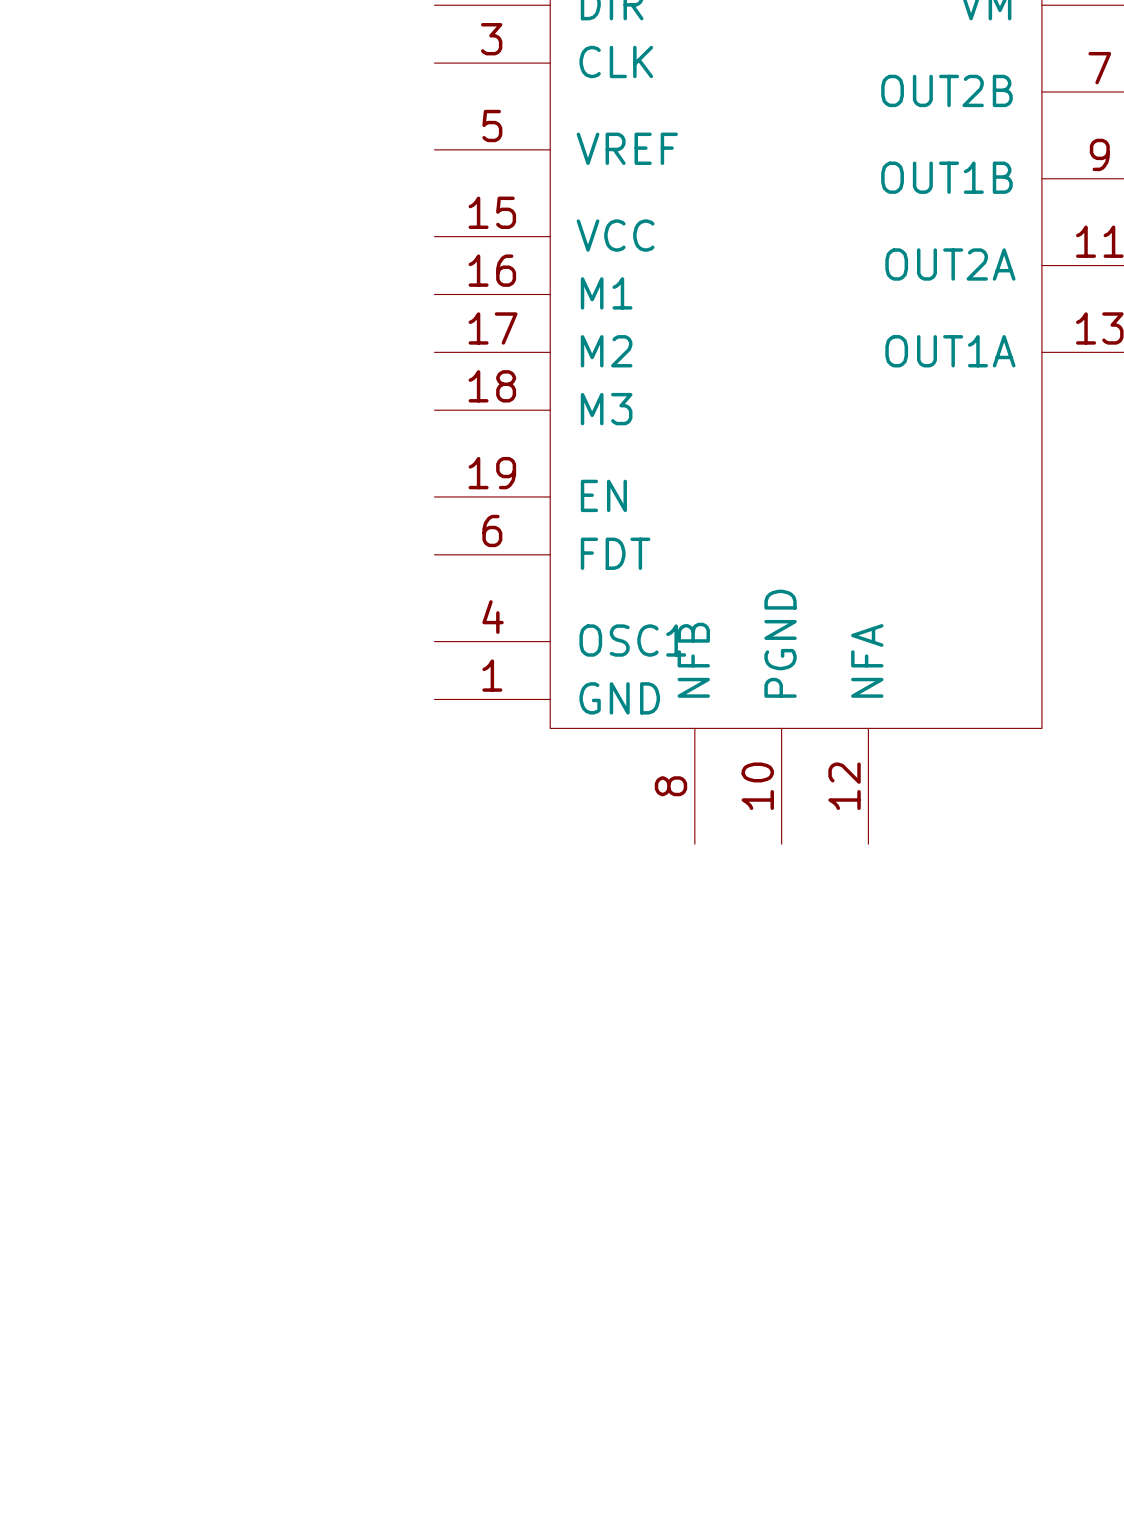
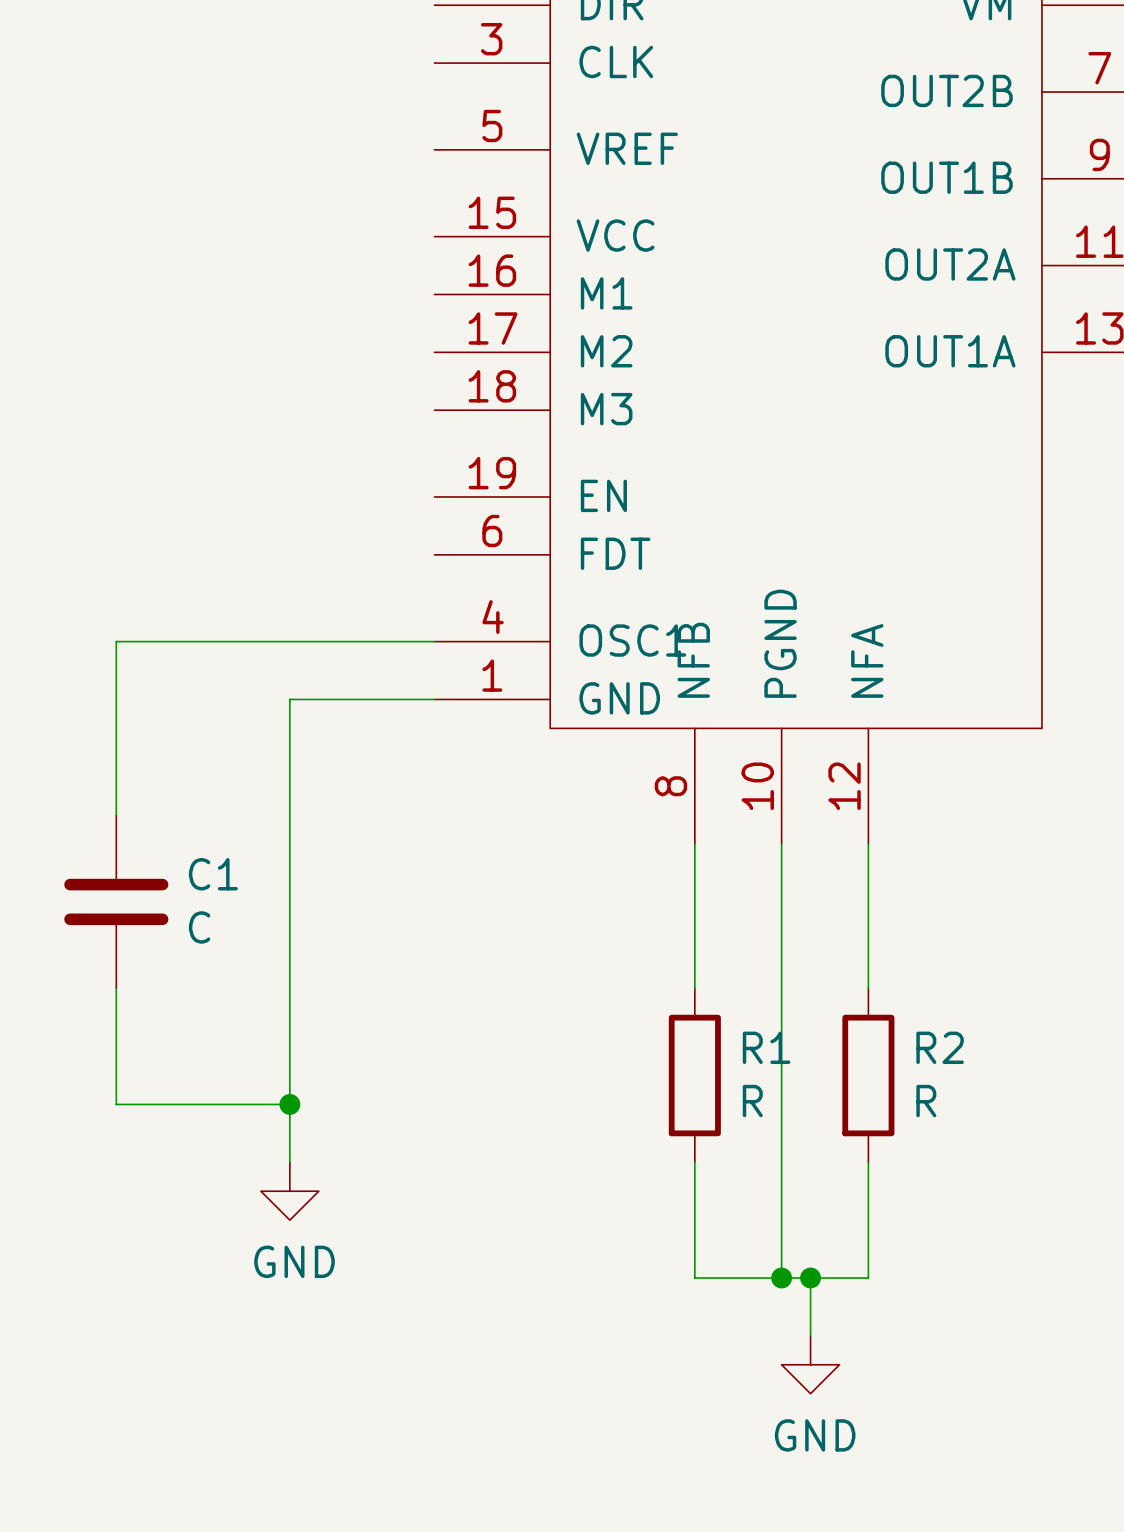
wire: none -> (434, 641) (116, 641) (116, 815)
wire: none -> (434, 699) (289, 699) (289, 1162)
wire: none -> (694, 844) (694, 988)
wire: none -> (781, 844) (781, 1277)
wire: none -> (868, 844) (868, 988)
C1: none -> C (116, 901)
wire: none -> (116, 988) (116, 1104) (289, 1104)
R1: none -> R (694, 1075)
R2: none -> R (868, 1075)
junction: none -> (289, 1104)
wire: none -> (694, 1162) (694, 1277) (868, 1277) (868, 1162)
power symbol: none -> GND (289, 1191)
junction: none -> (781, 1277)
wire: none -> (810, 1277) (810, 1335)
junction: none -> (810, 1277)
power symbol: none -> GND (810, 1364)

